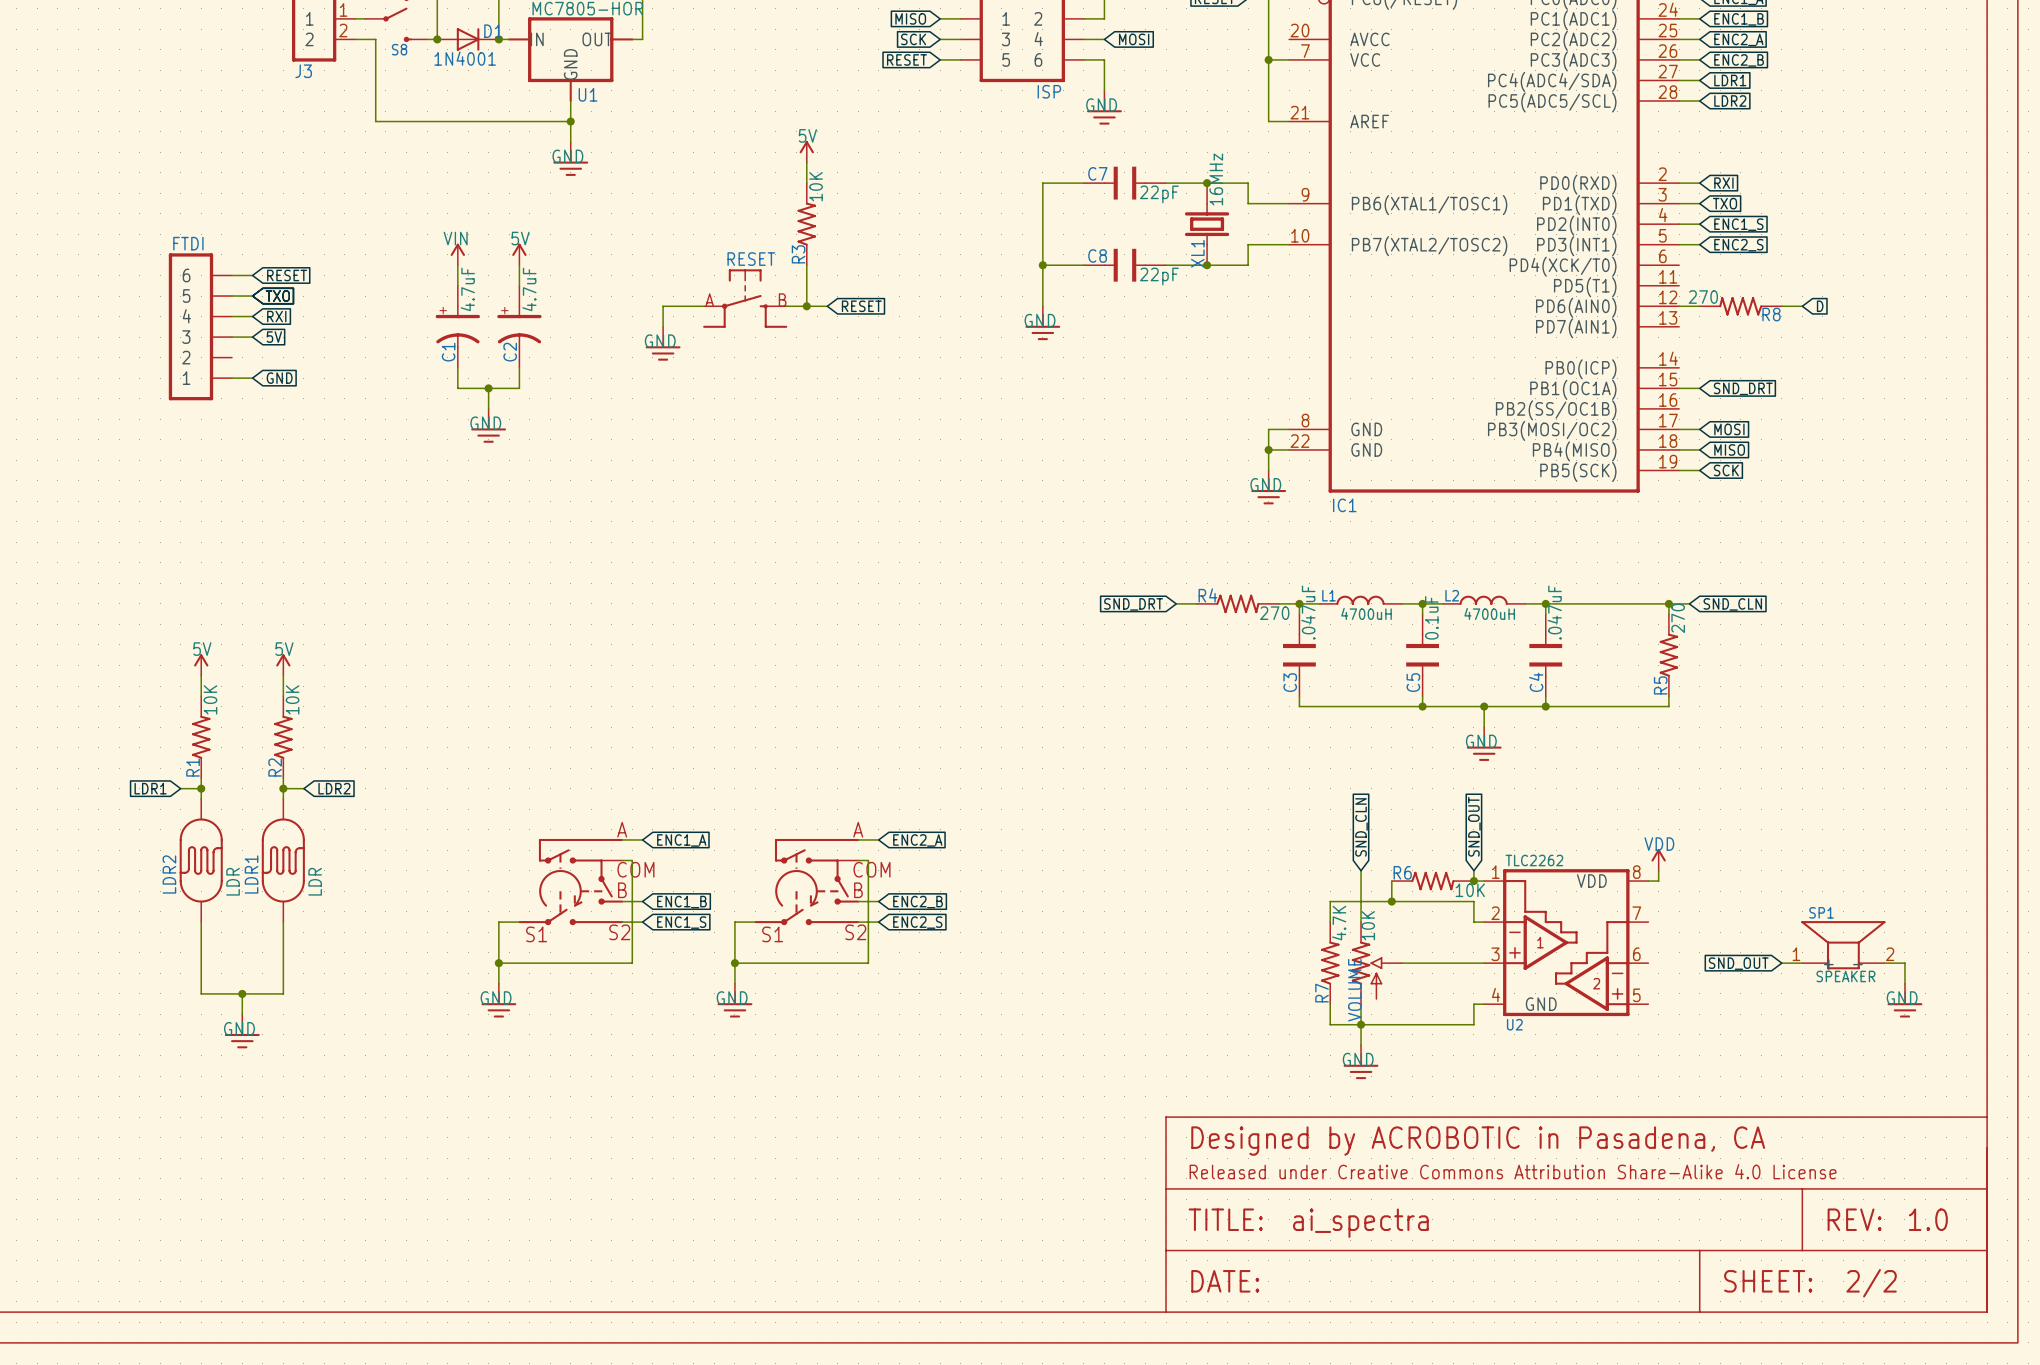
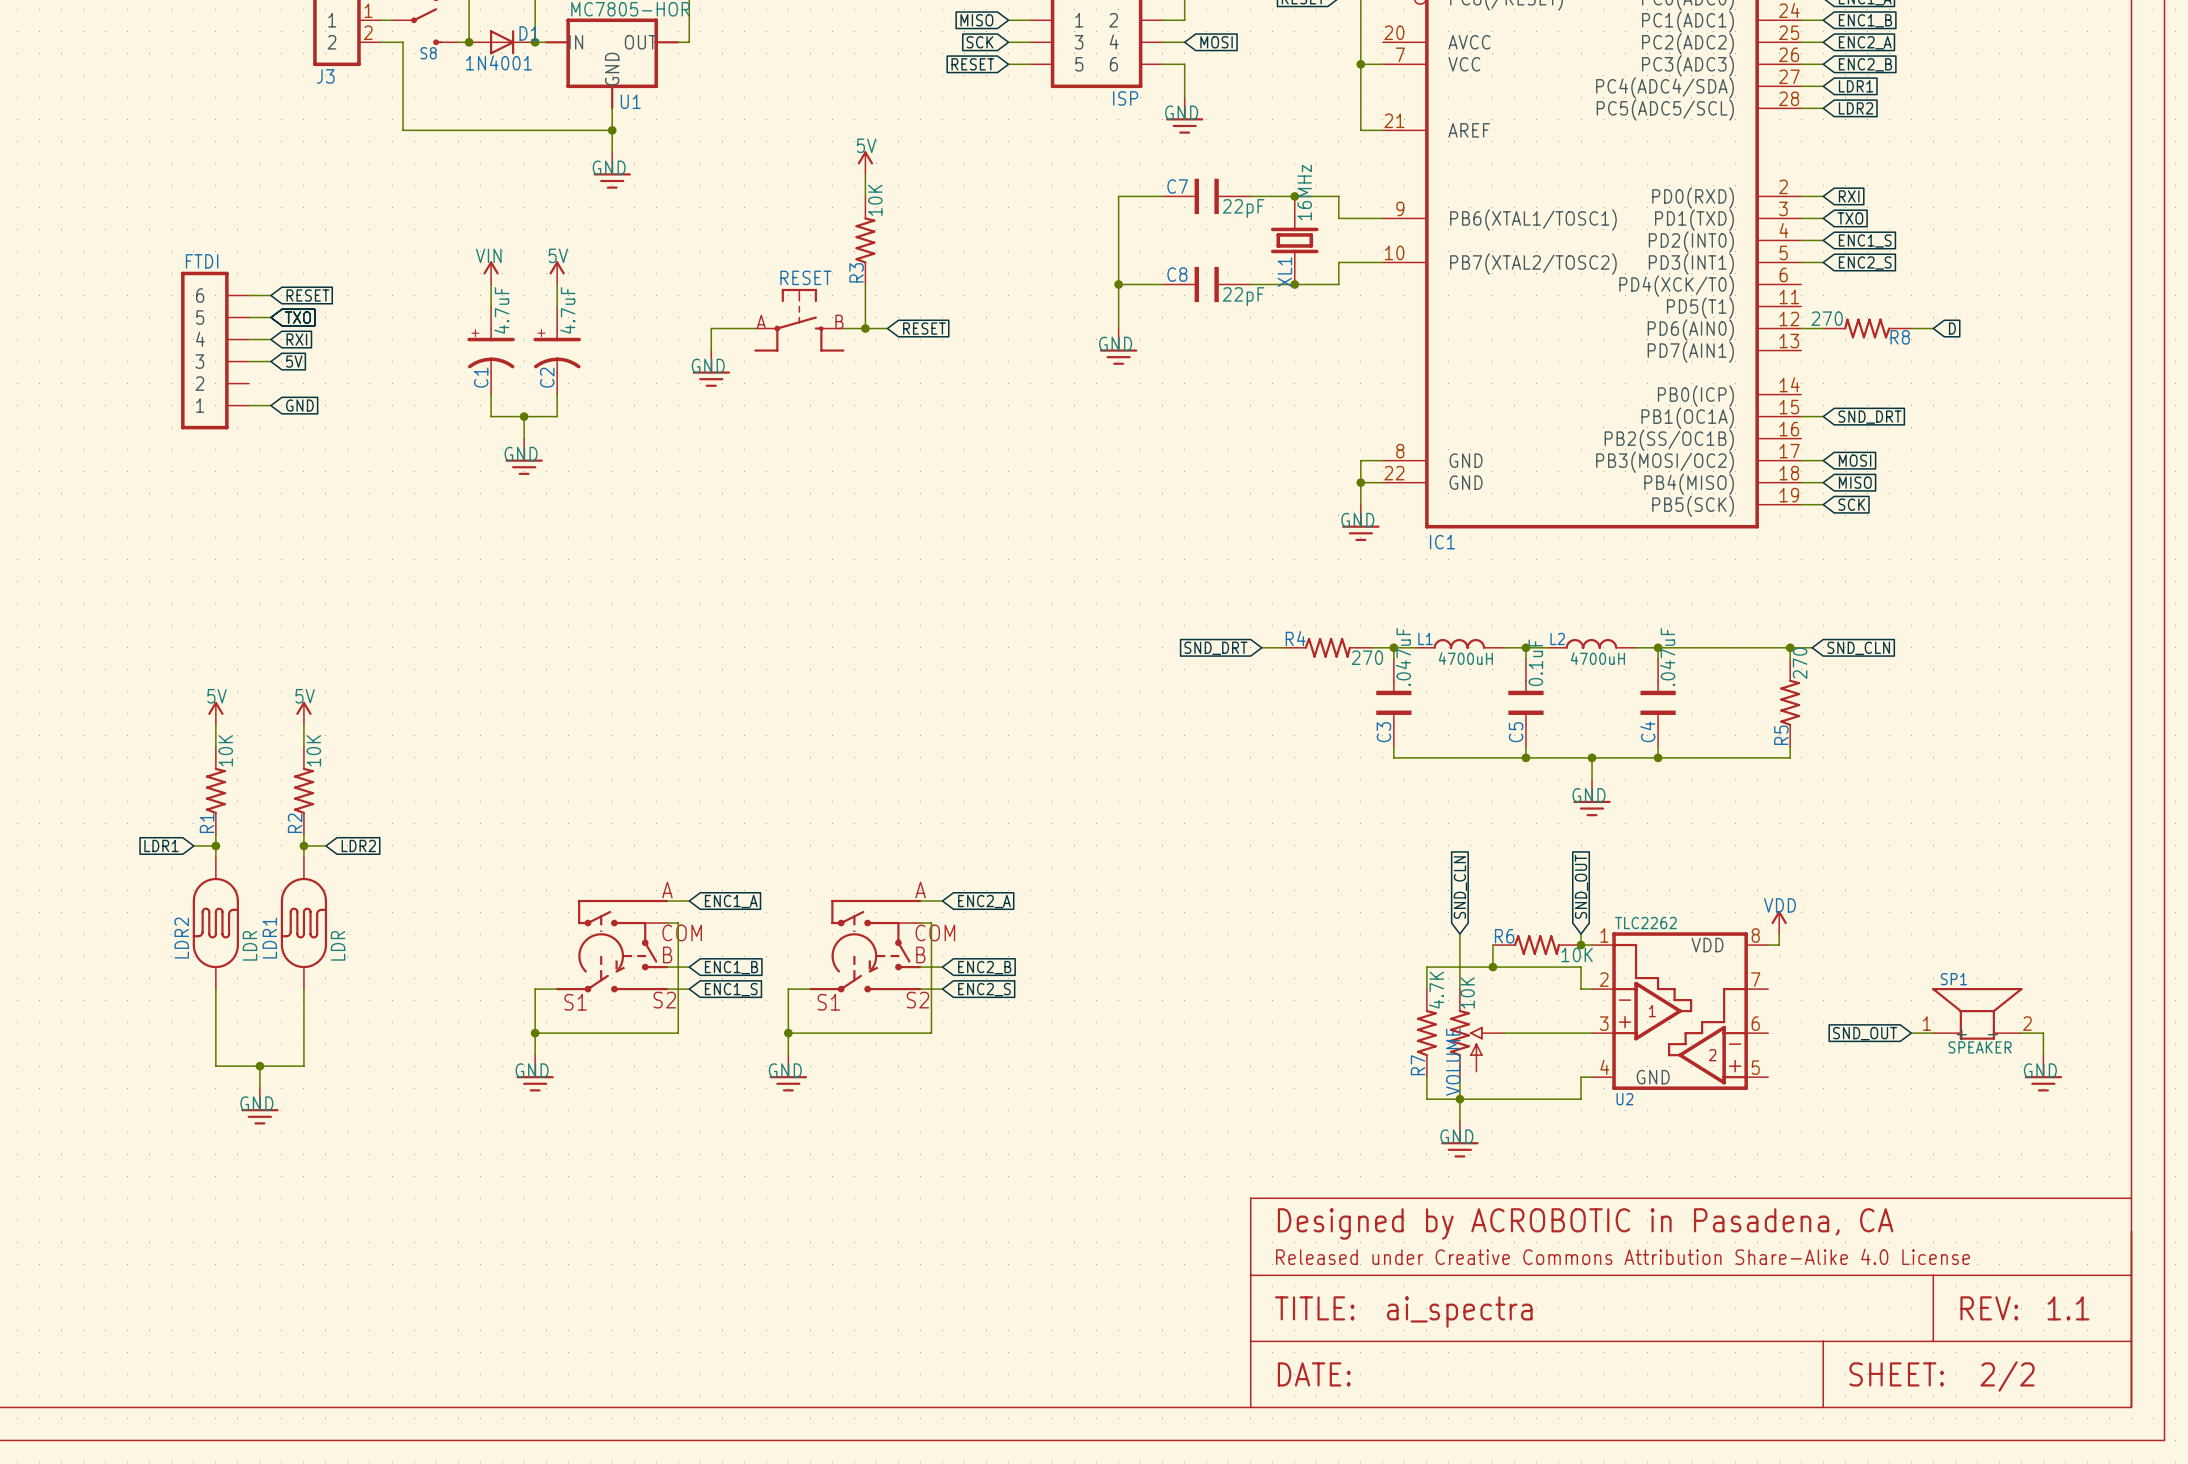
part text: 1.0 (1928, 1219) -> 1.1 (2068, 1308)

